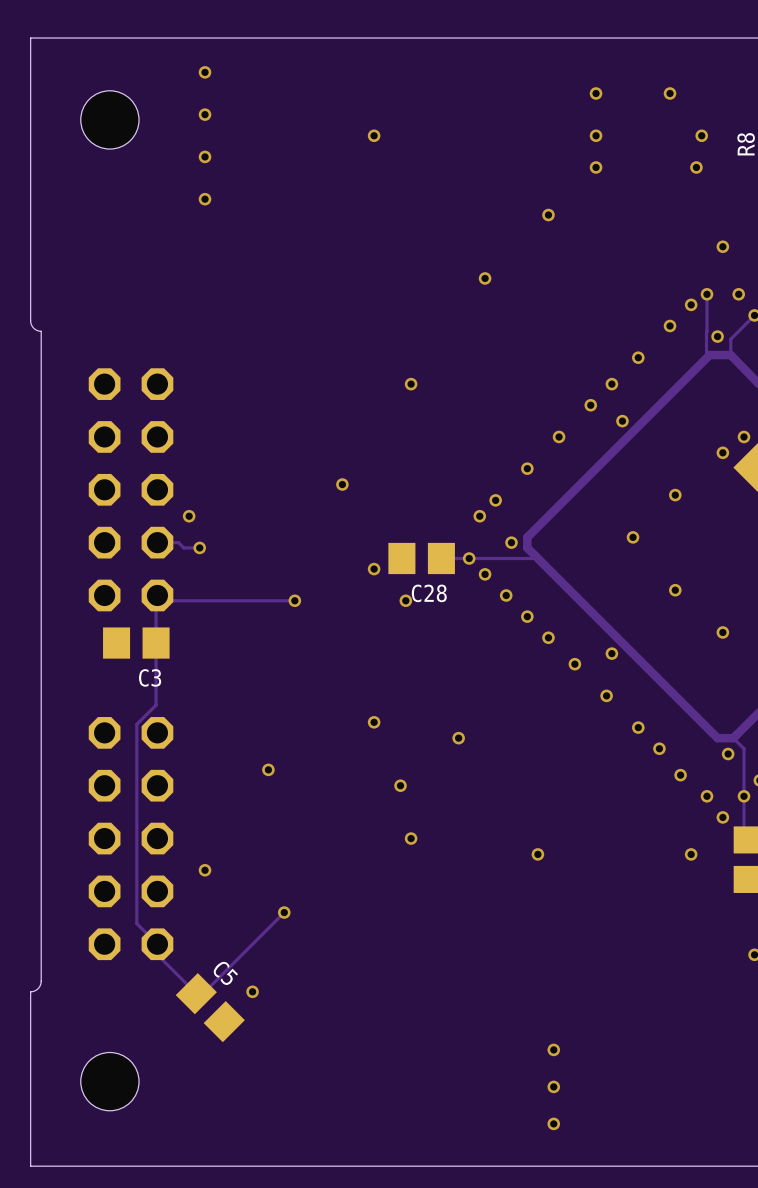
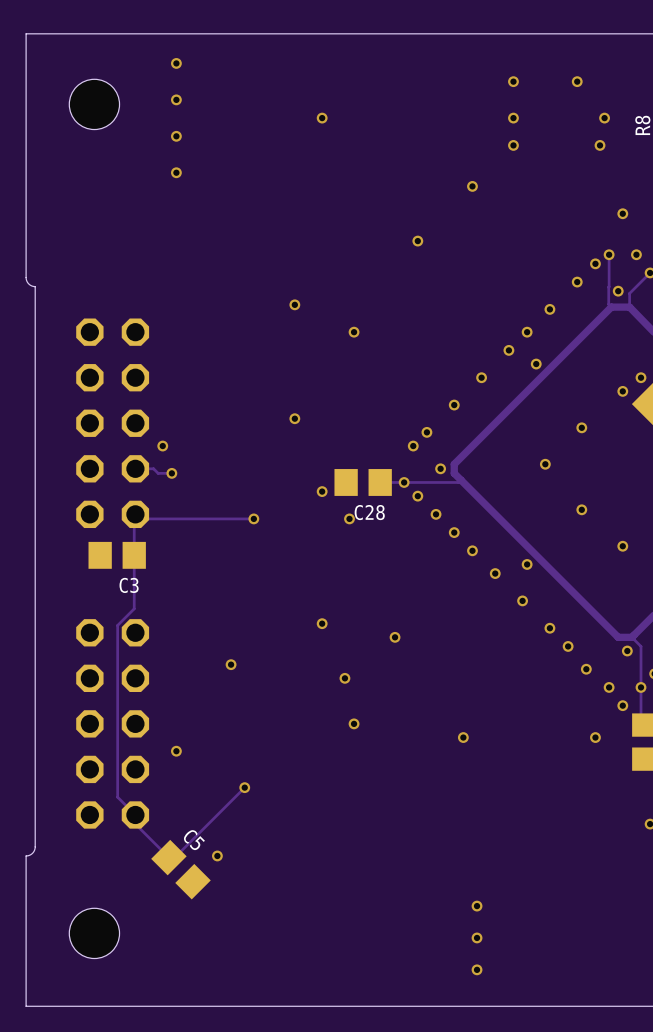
via: none -> (294, 304)

